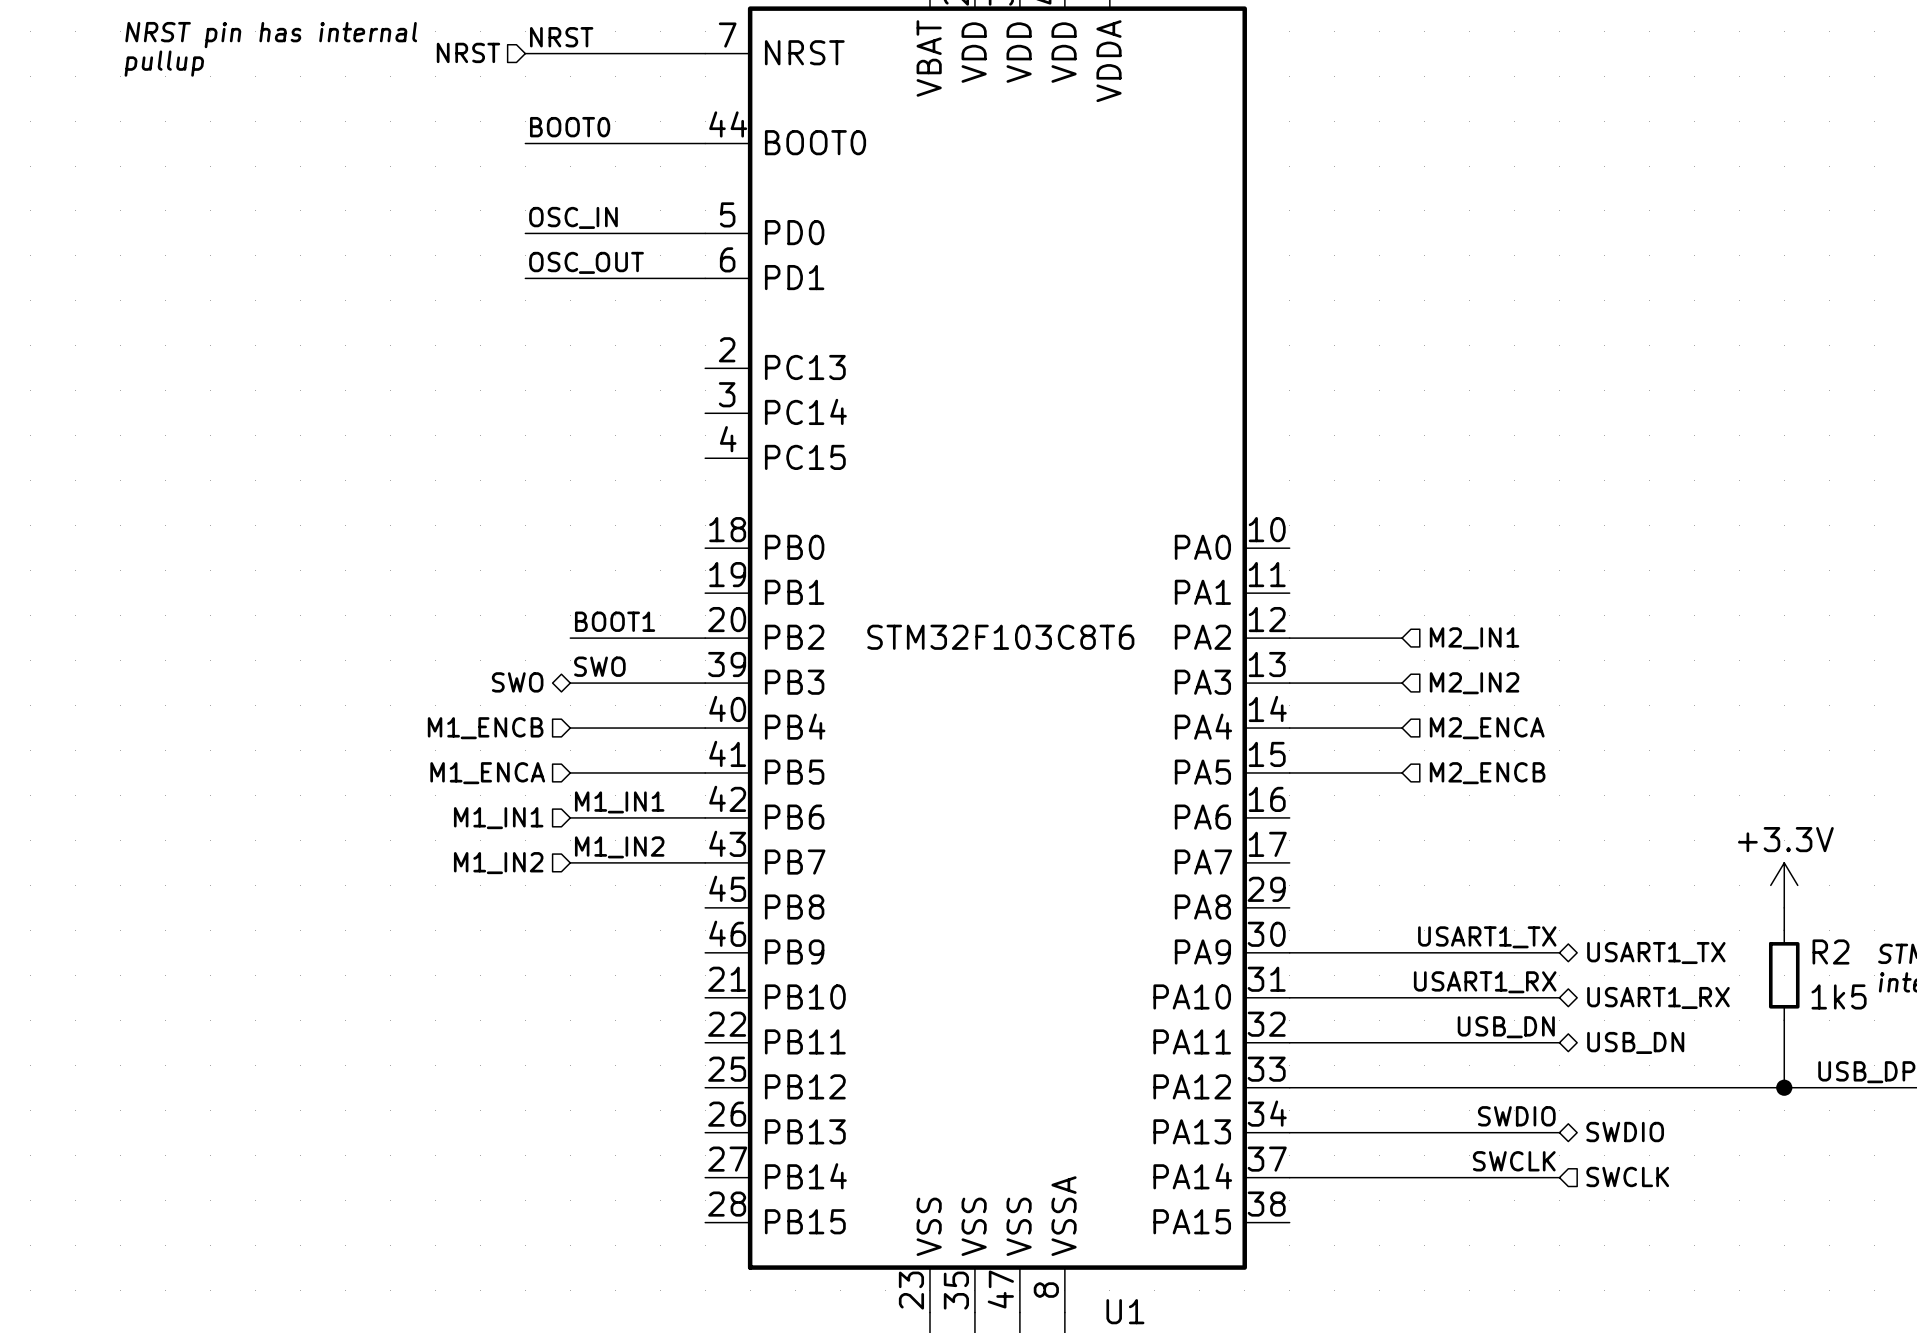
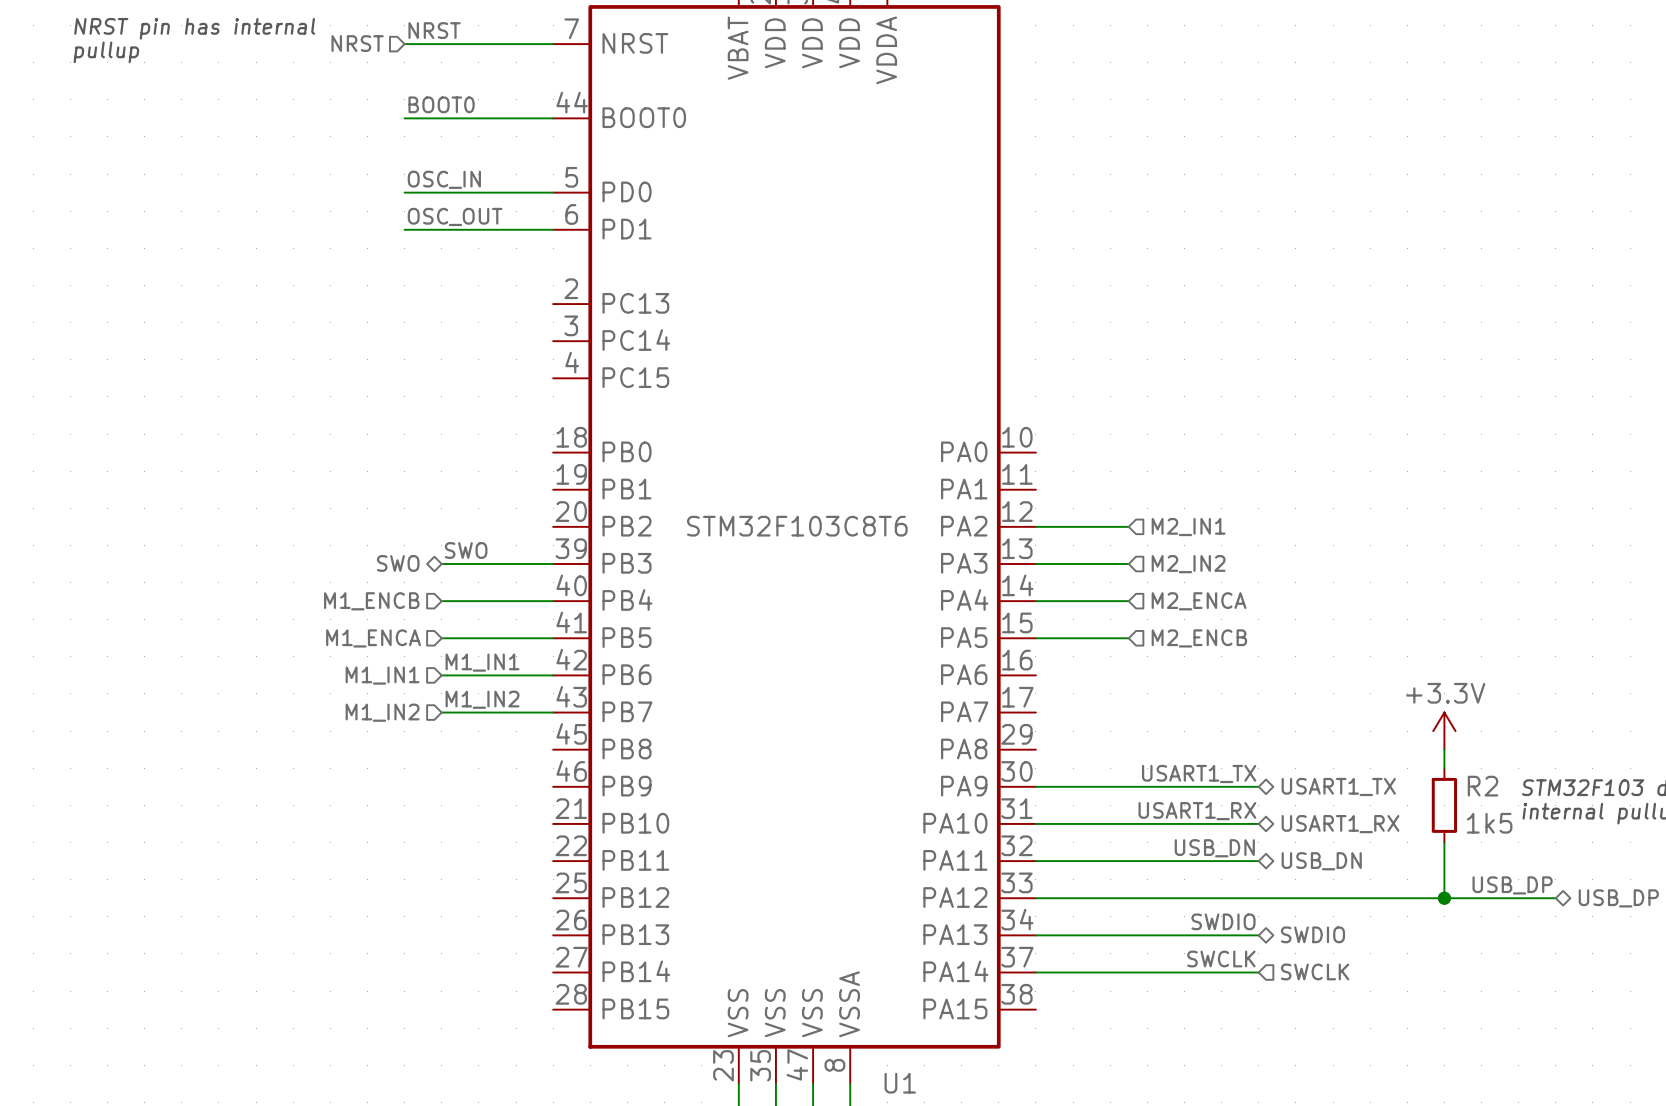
label: BOOT1 (615, 621) -> none
wire: (570, 638) (705, 638) -> none

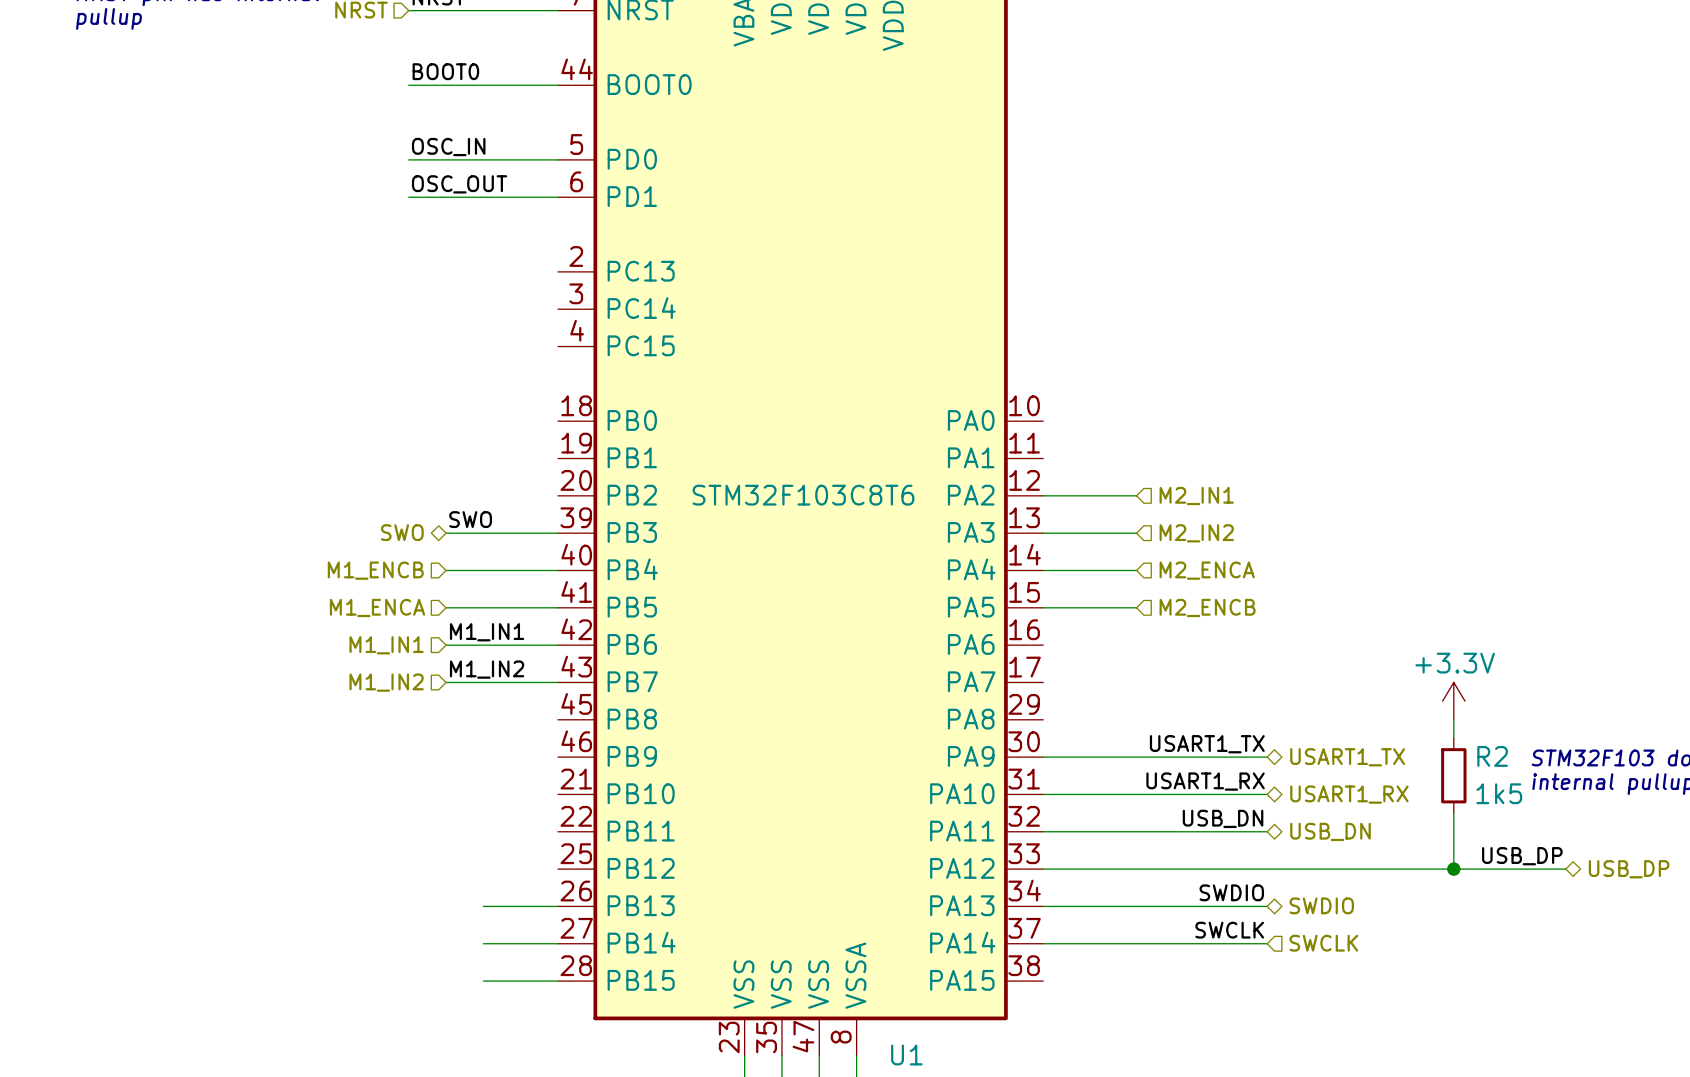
wire: none -> (483, 906) (558, 906)
wire: none -> (483, 943) (558, 943)
wire: none -> (483, 981) (558, 981)

